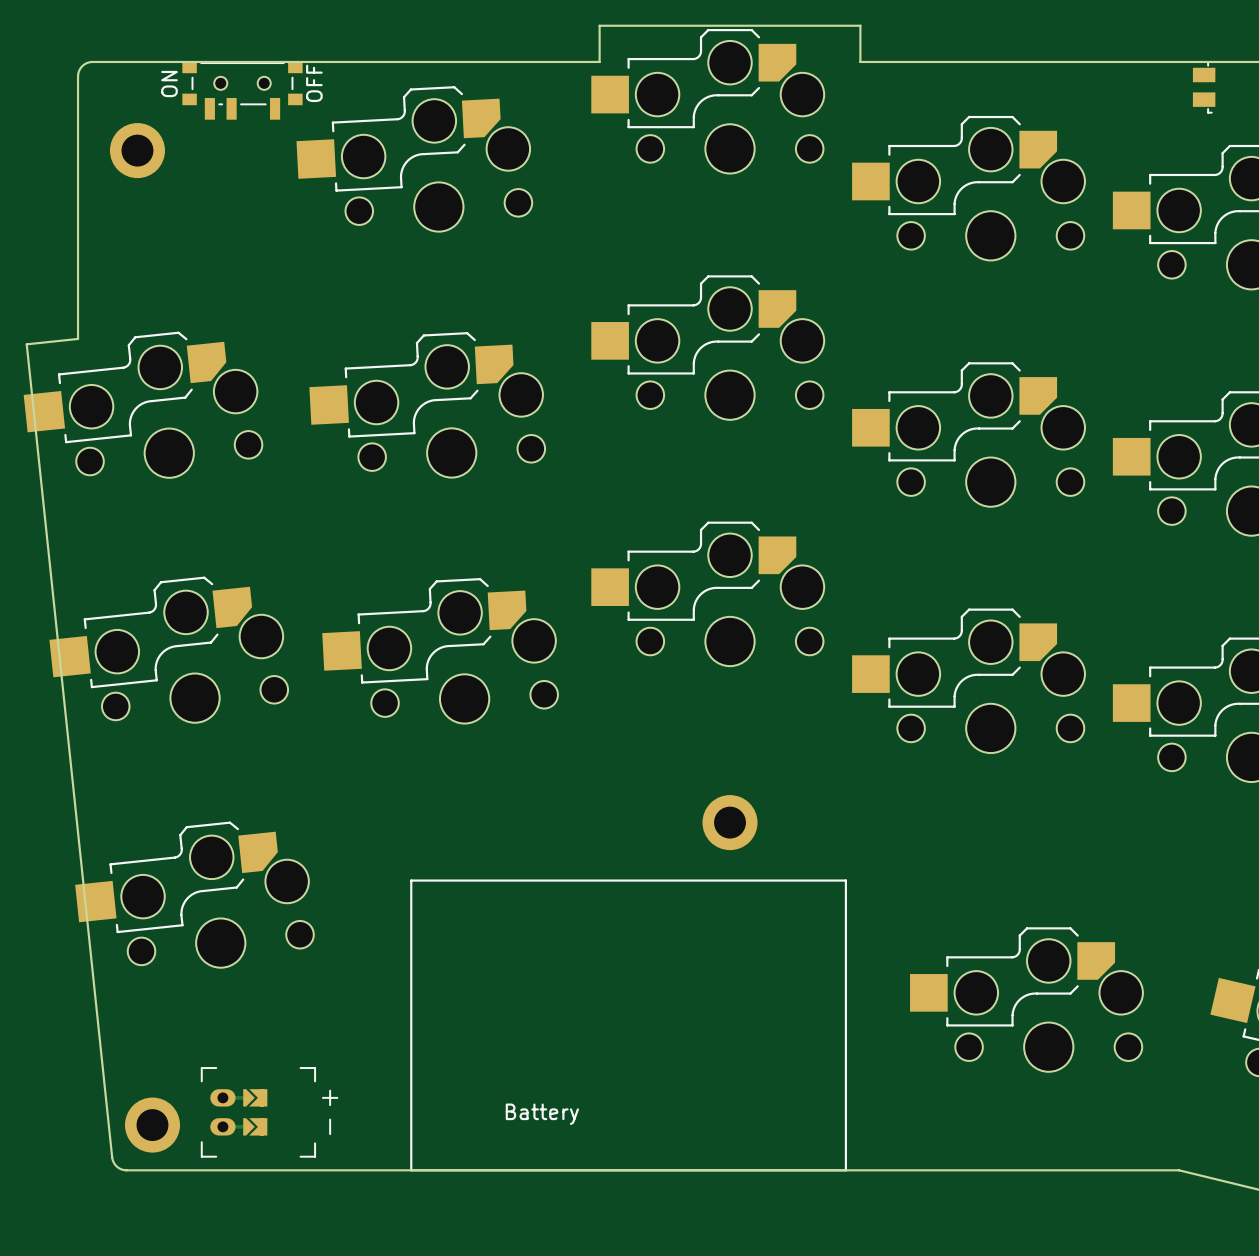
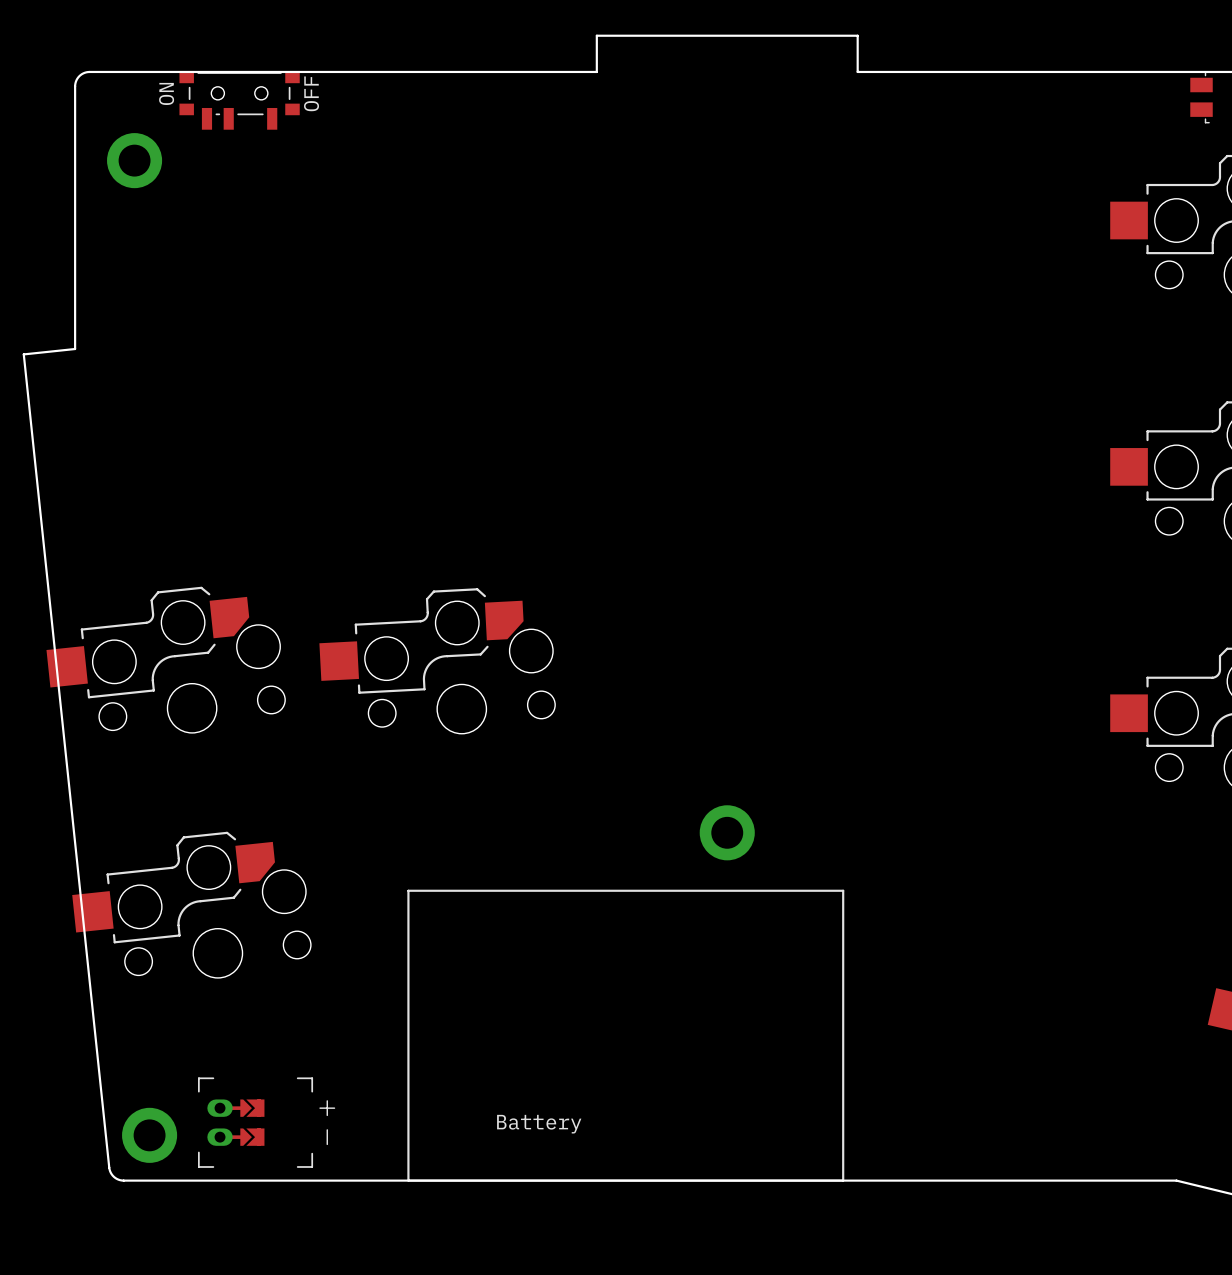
part: (707, 101) -> none
part: (414, 158) -> none
part: (968, 188) -> none
part: (707, 347) -> none
part: (142, 404) -> none
part: (427, 404) -> none
part: (968, 434) -> none
part: (707, 593) -> none
part: (968, 680) -> none
part: (1026, 999) -> none

